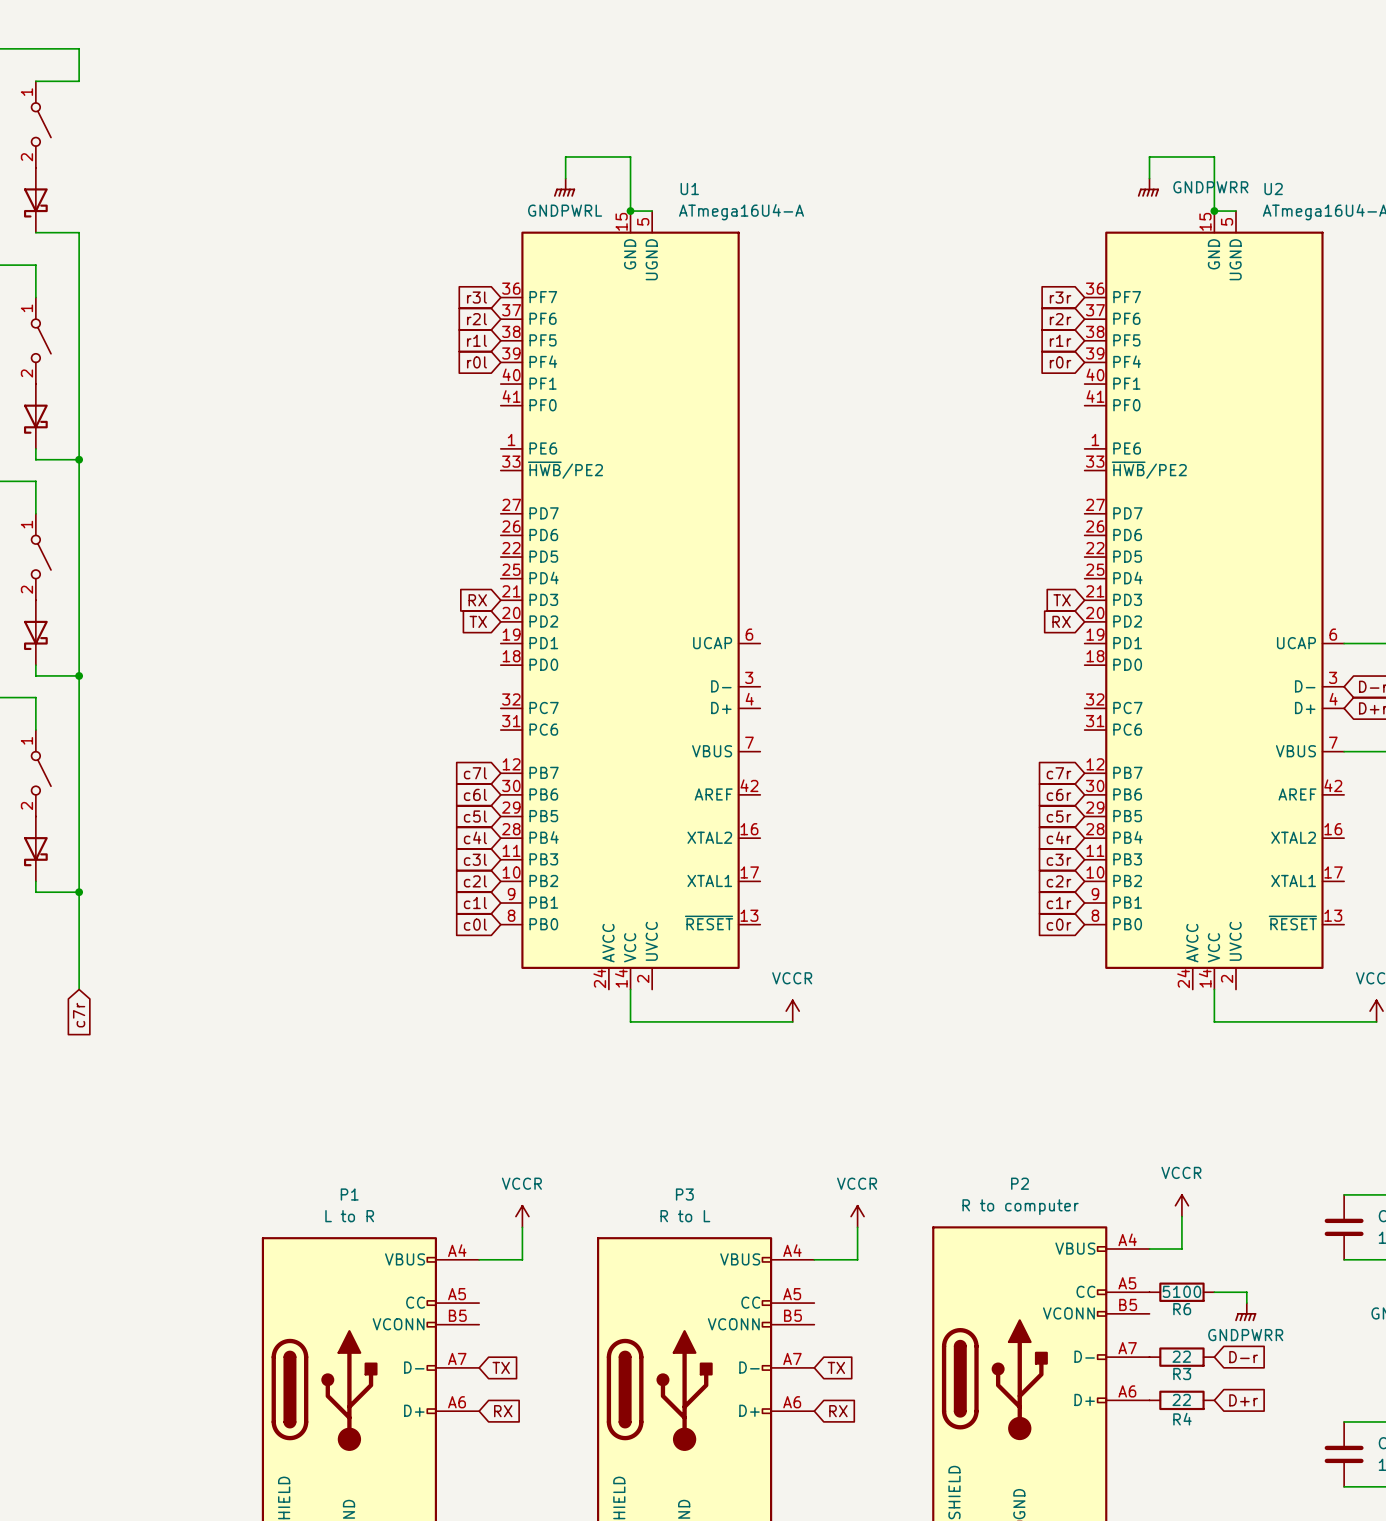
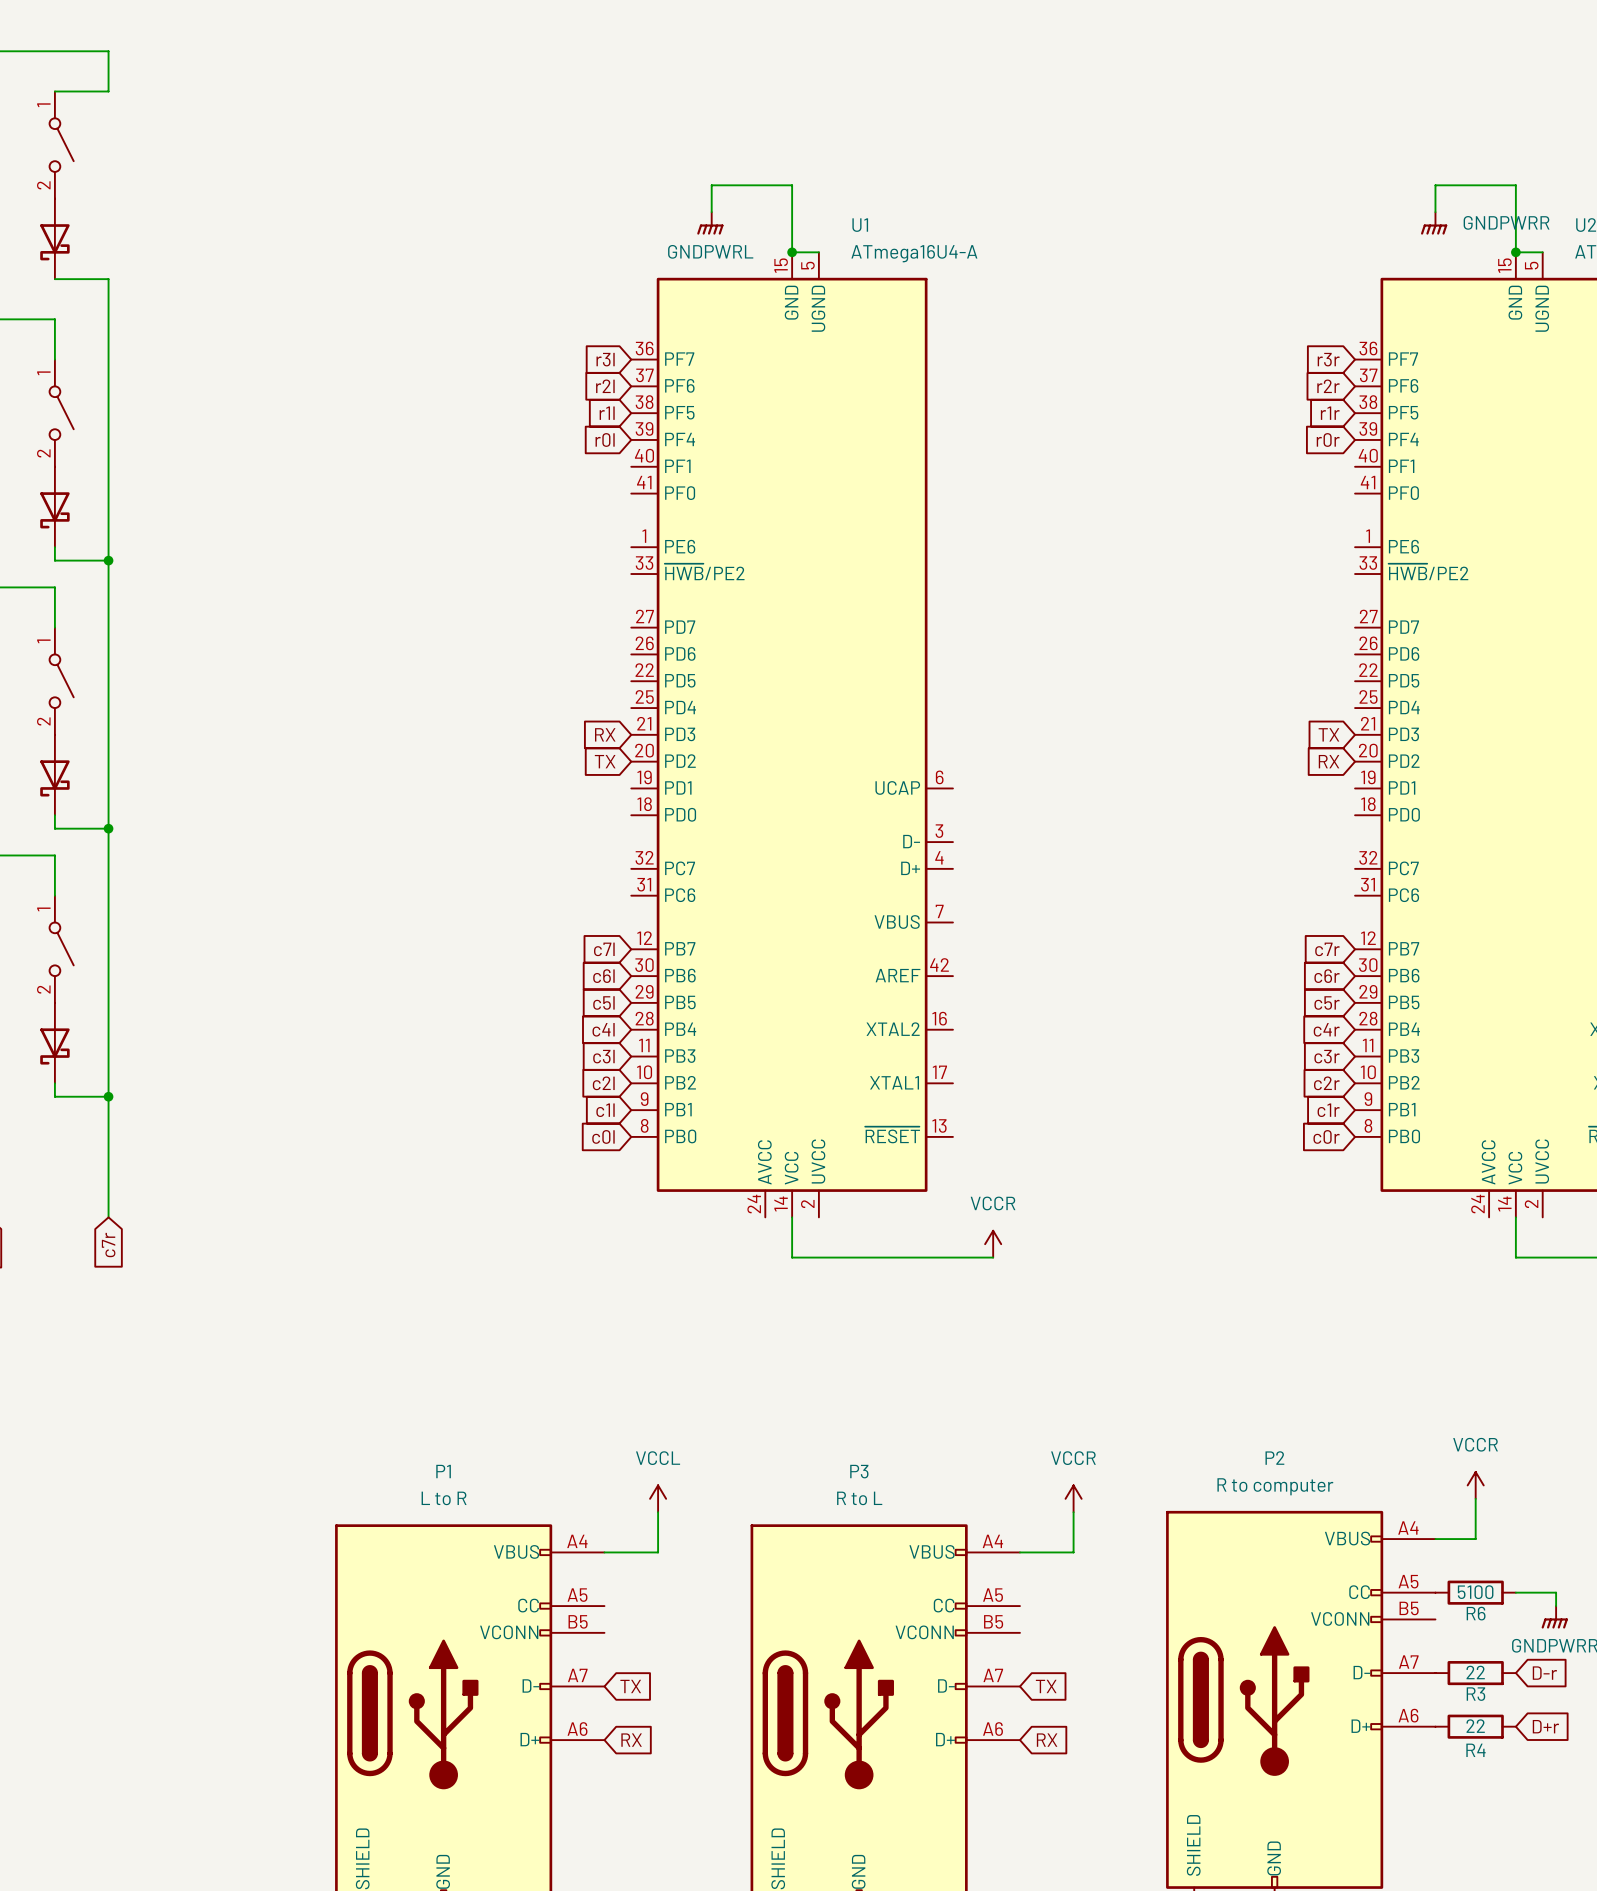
power symbol: VCCR (522, 1216) -> VCCL (658, 1498)

